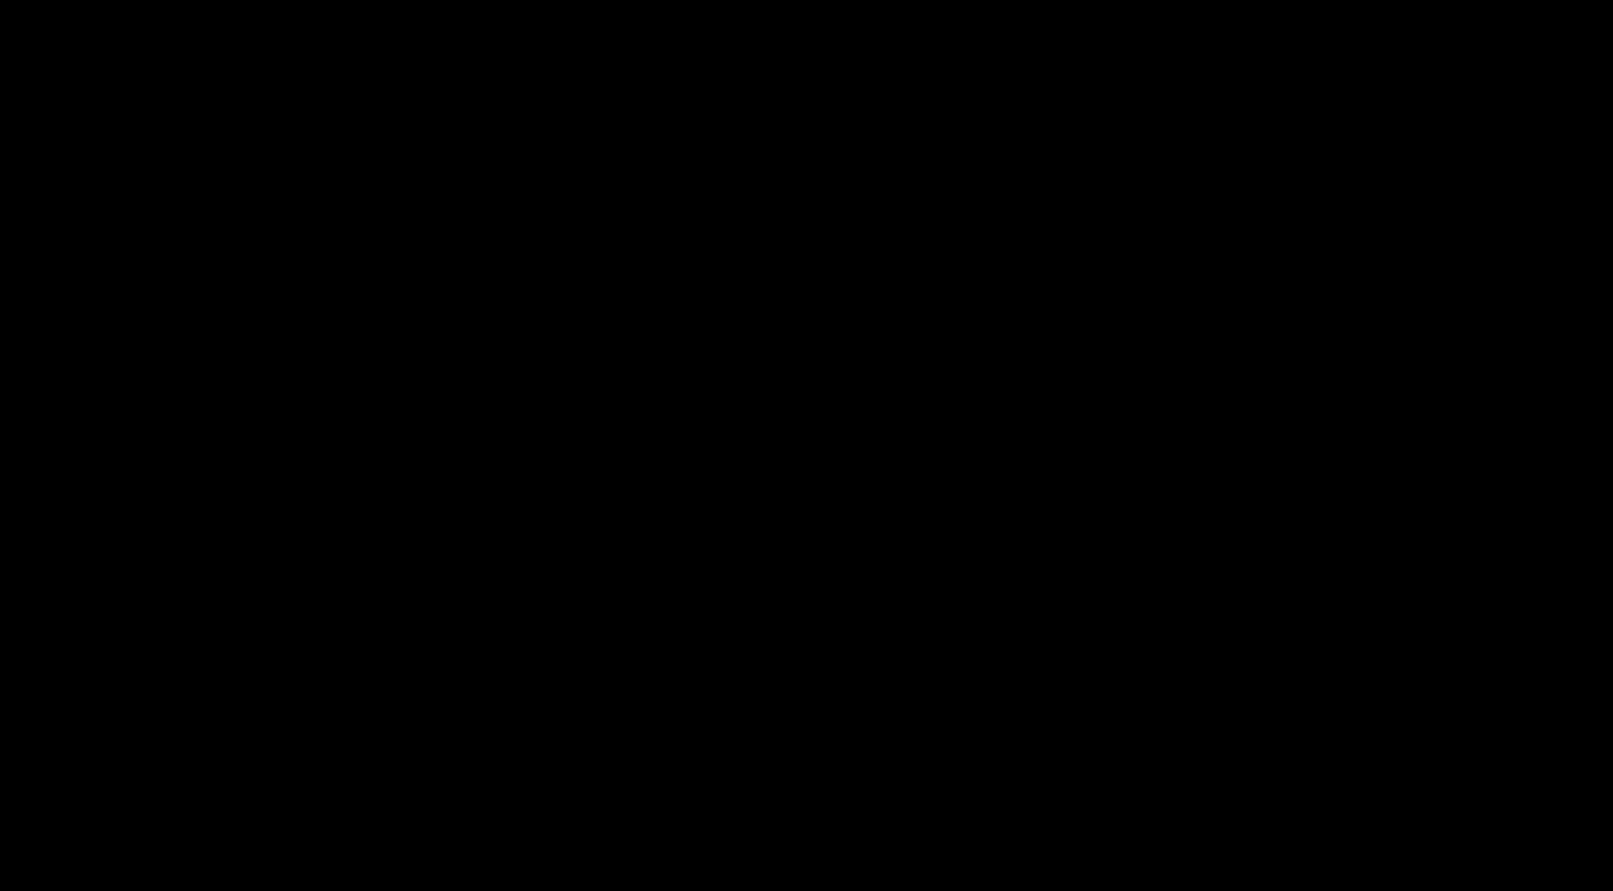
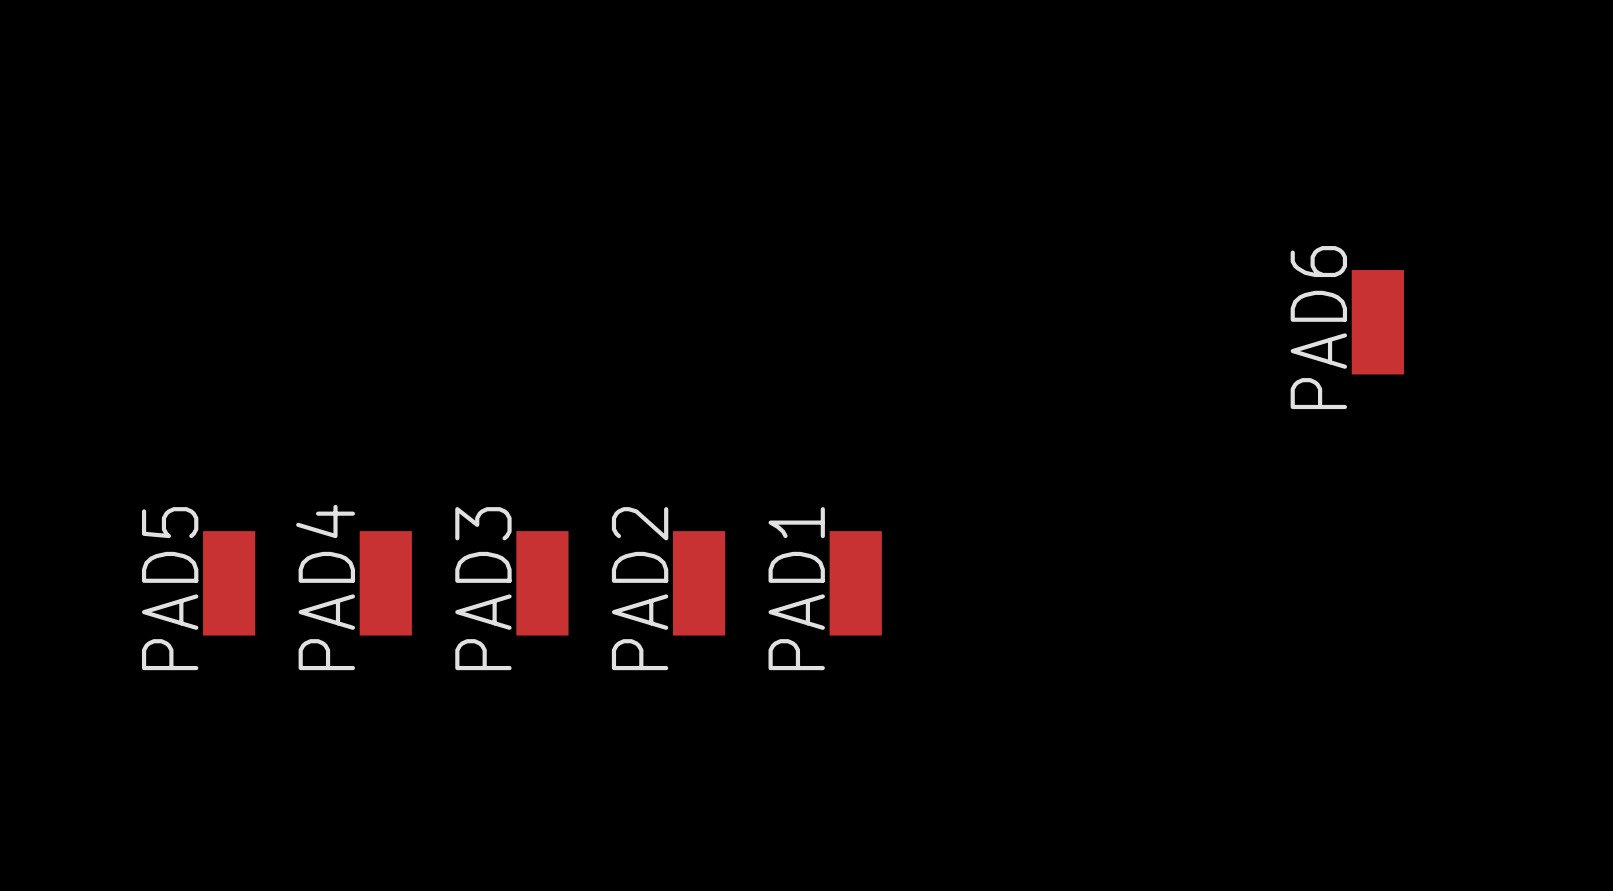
PAD6: none -> (1377, 322)
PAD5: none -> (229, 583)
PAD4: none -> (385, 583)
PAD3: none -> (542, 583)
PAD2: none -> (699, 583)
PAD1: none -> (855, 583)

